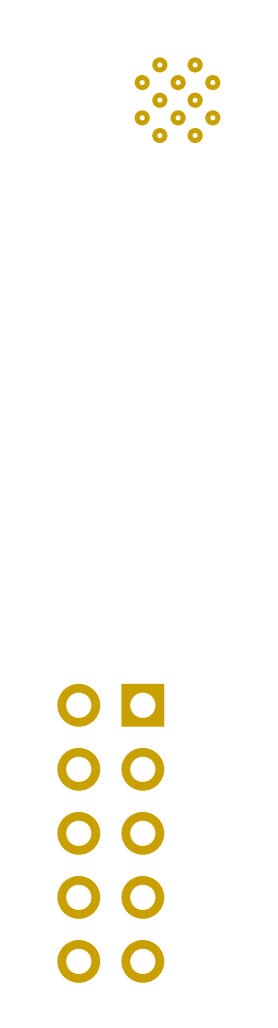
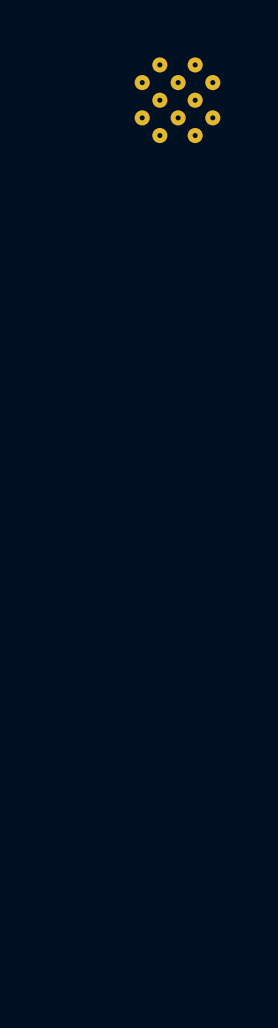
part: (110, 833) -> none

